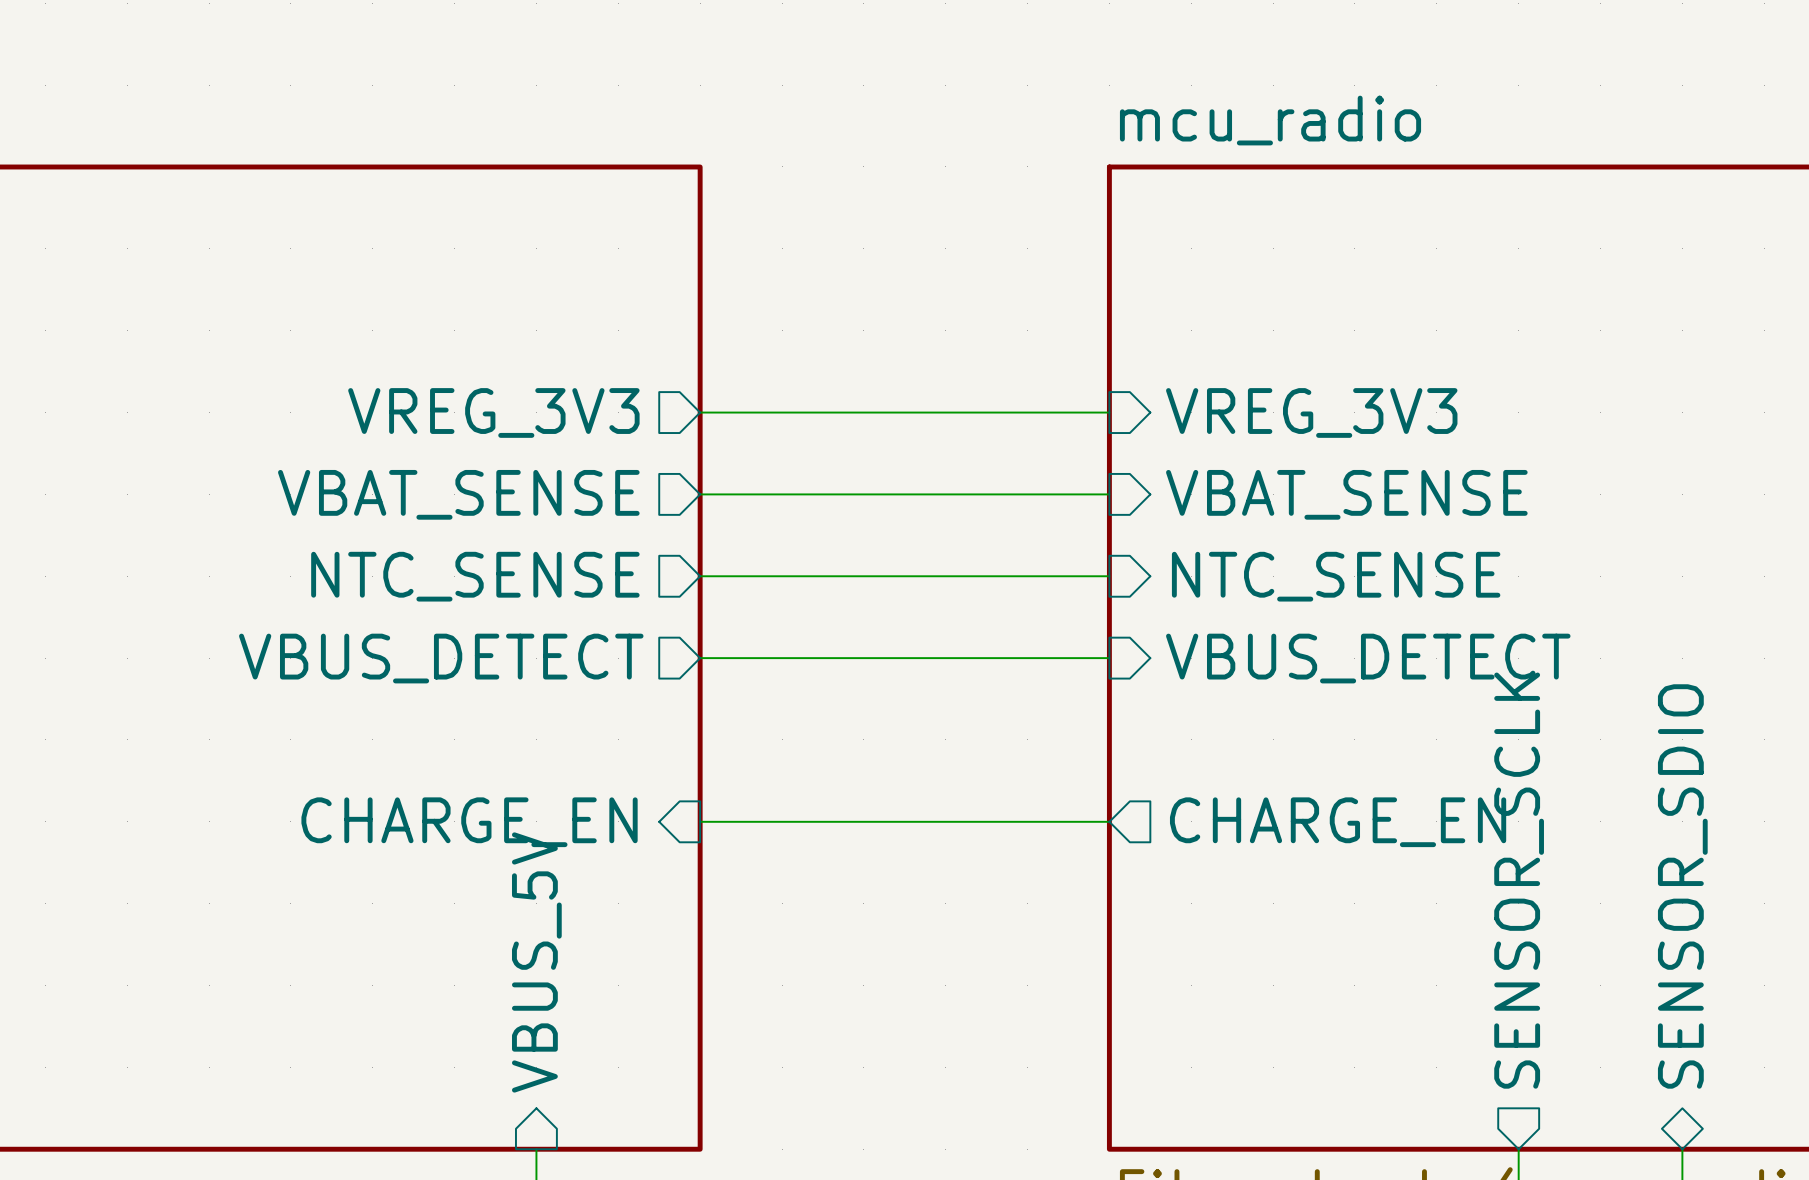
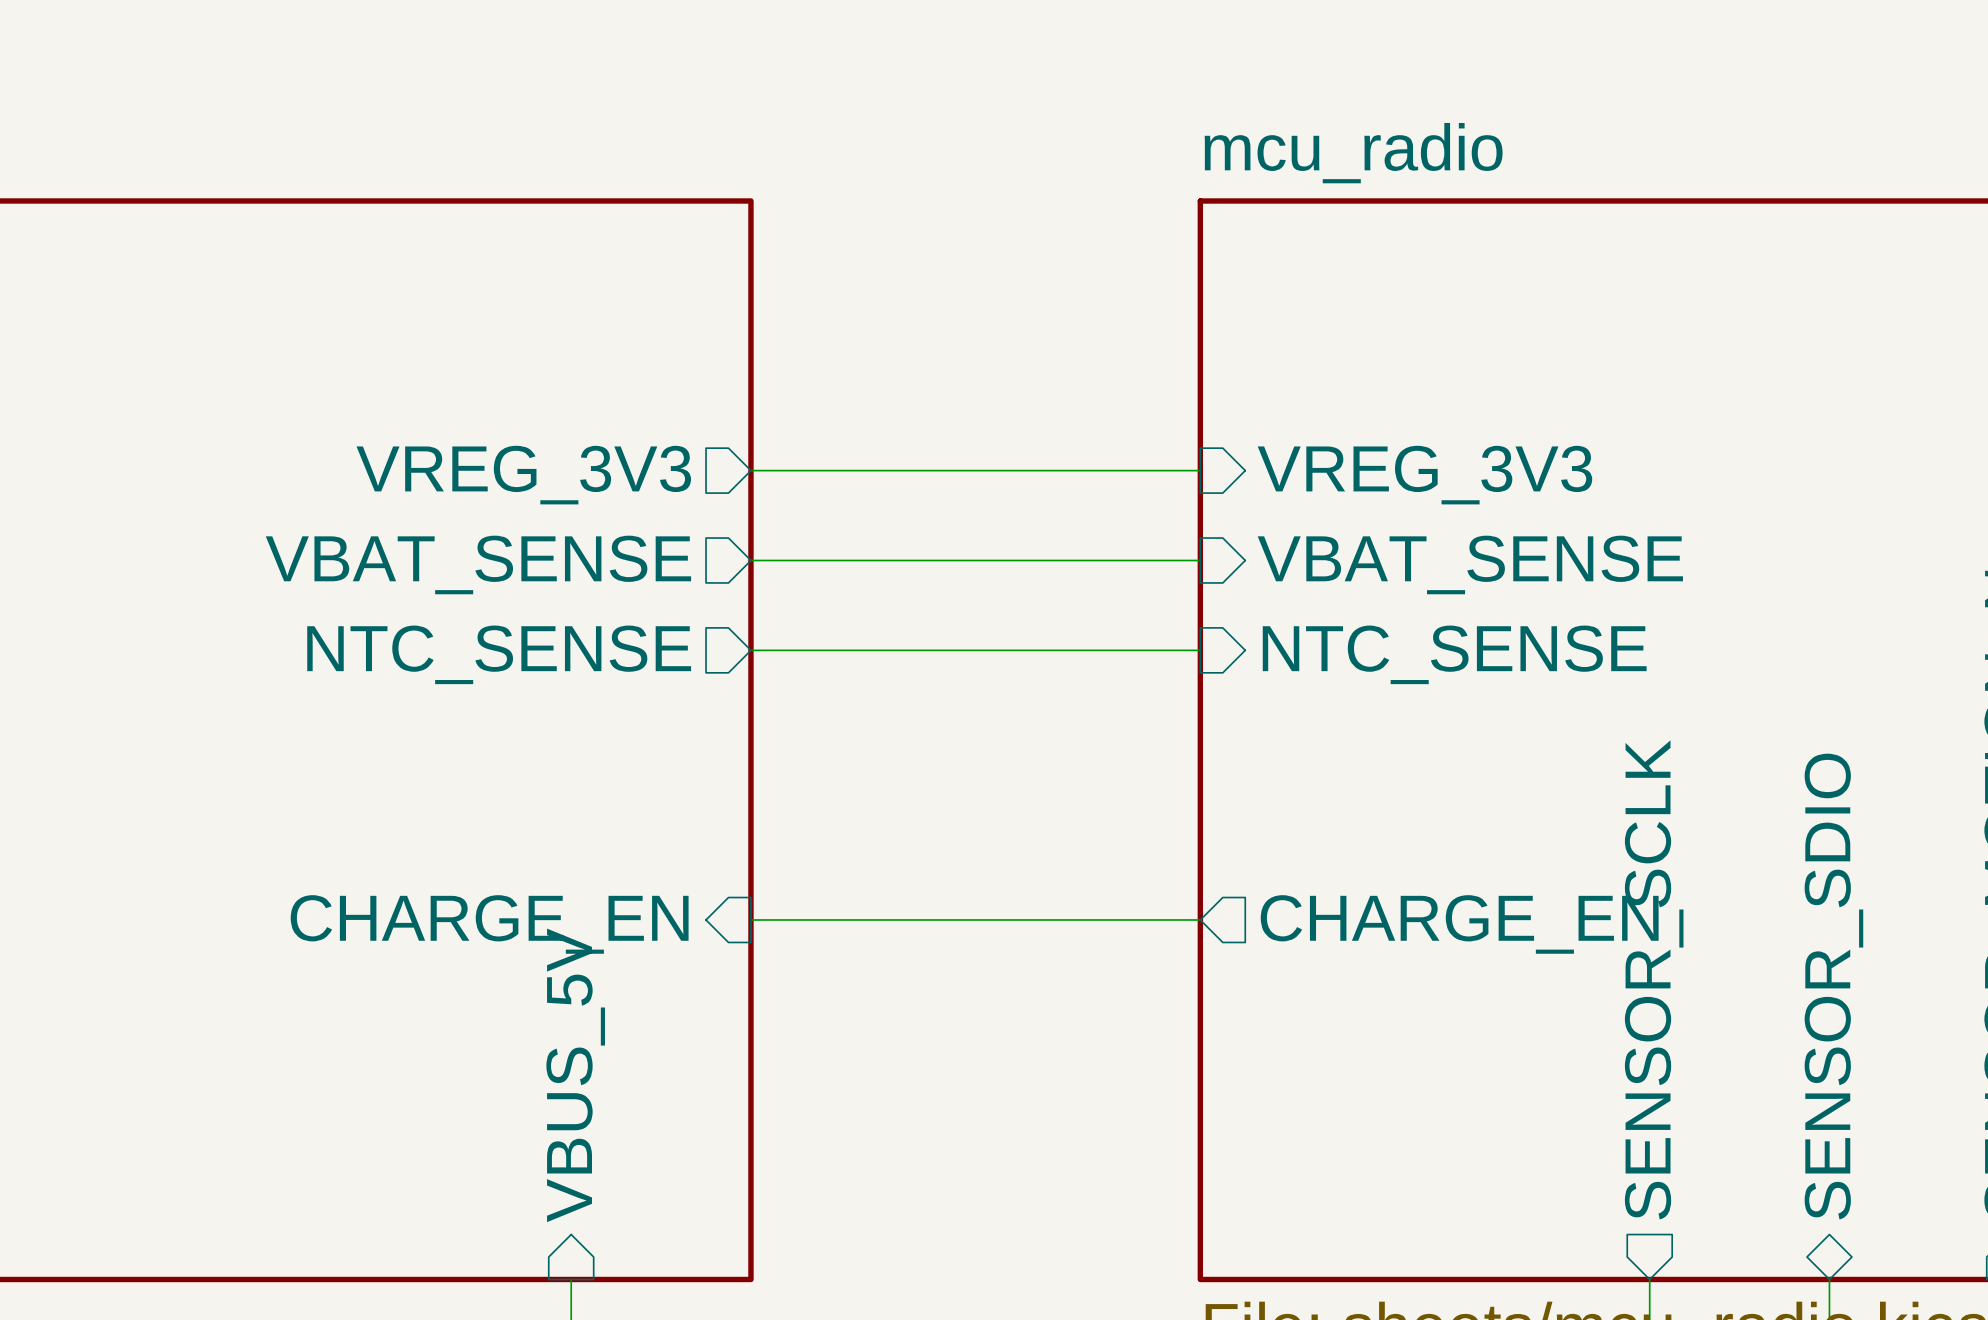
sheet pin: VBUS_DETECT (441, 658) -> none
wire: (700, 658) (1109, 658) -> none
sheet pin: VBUS_DETECT (1368, 658) -> none

